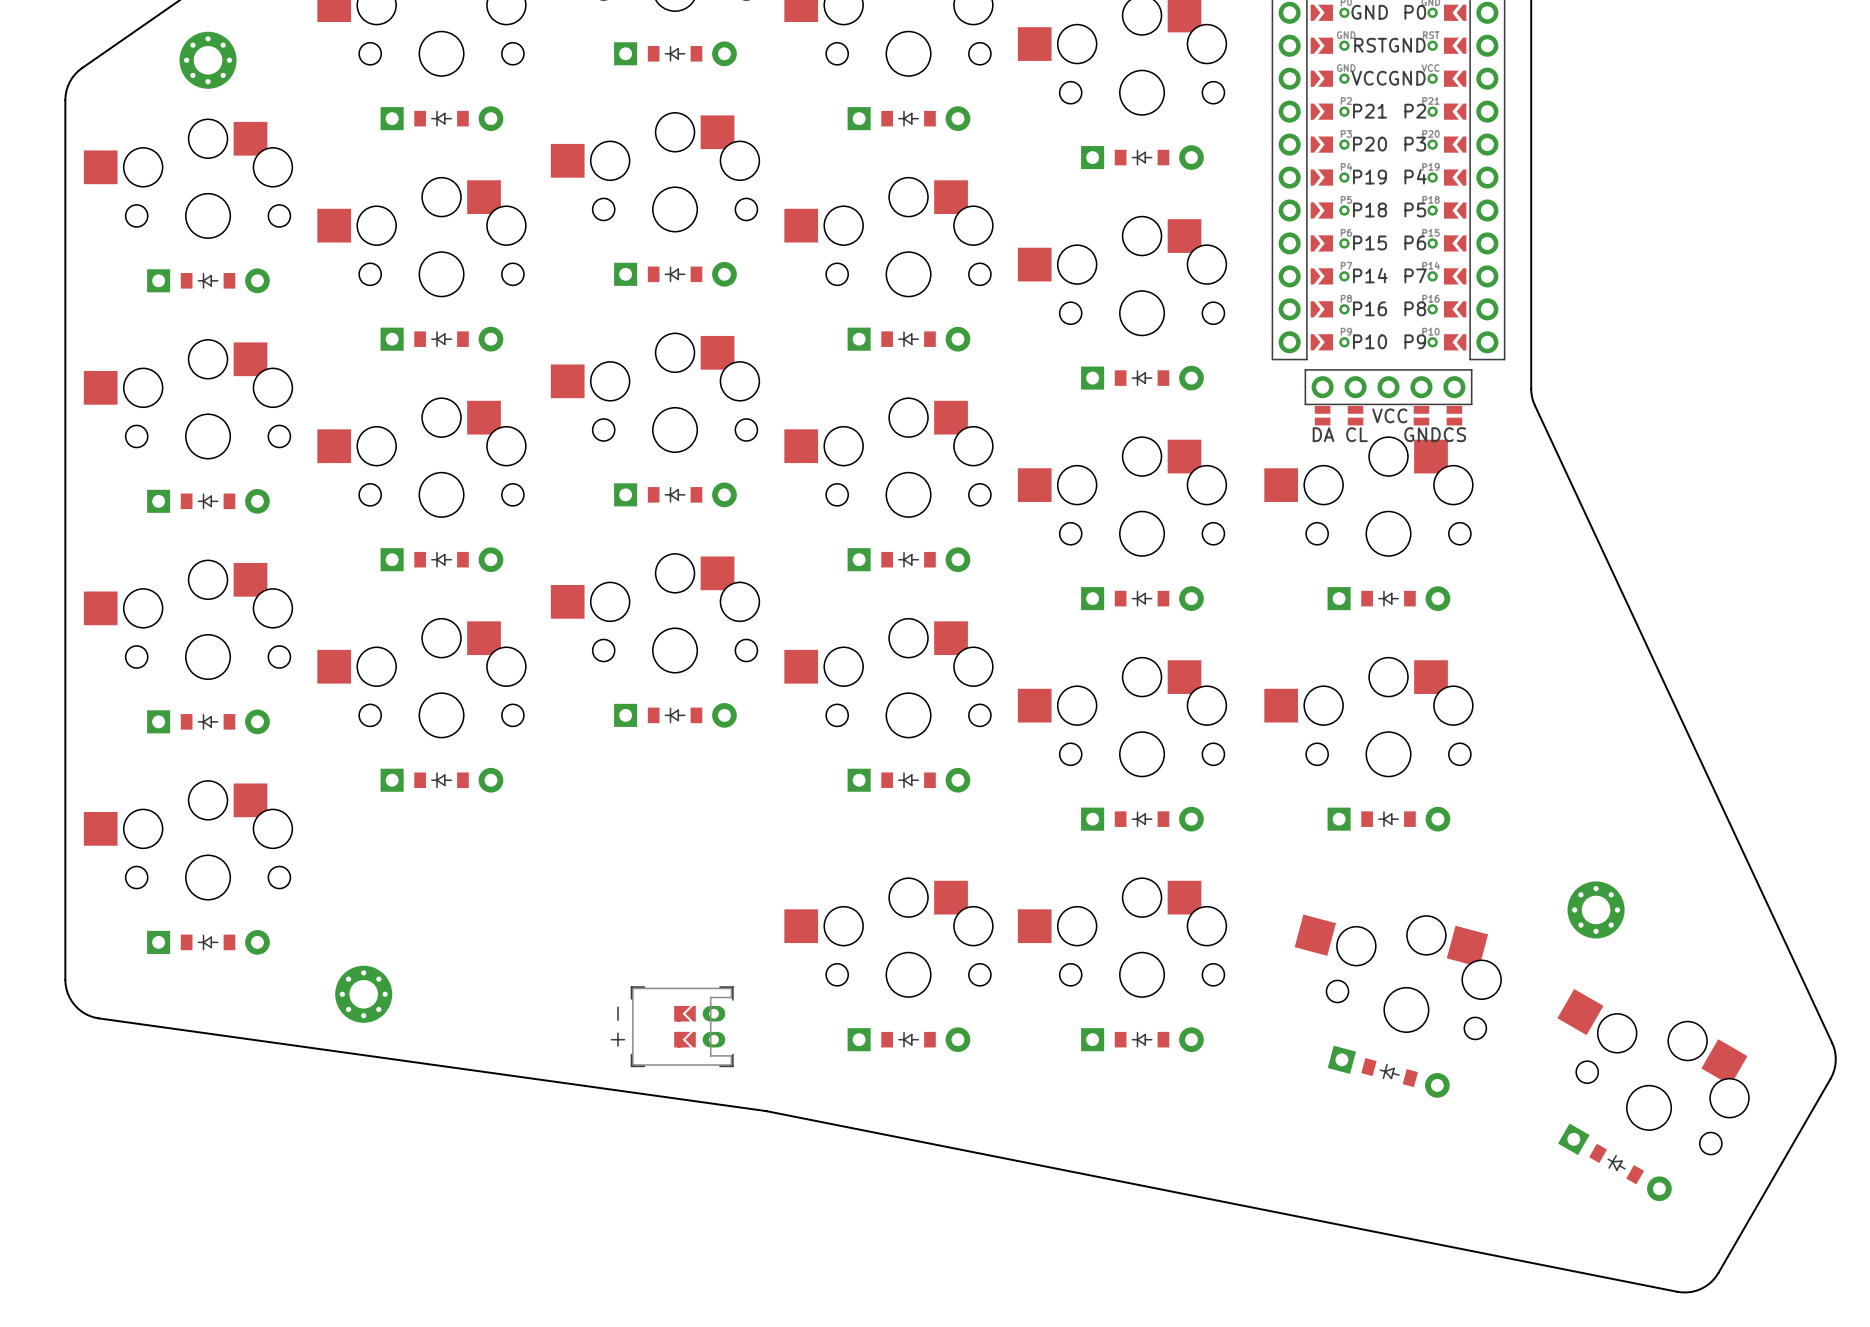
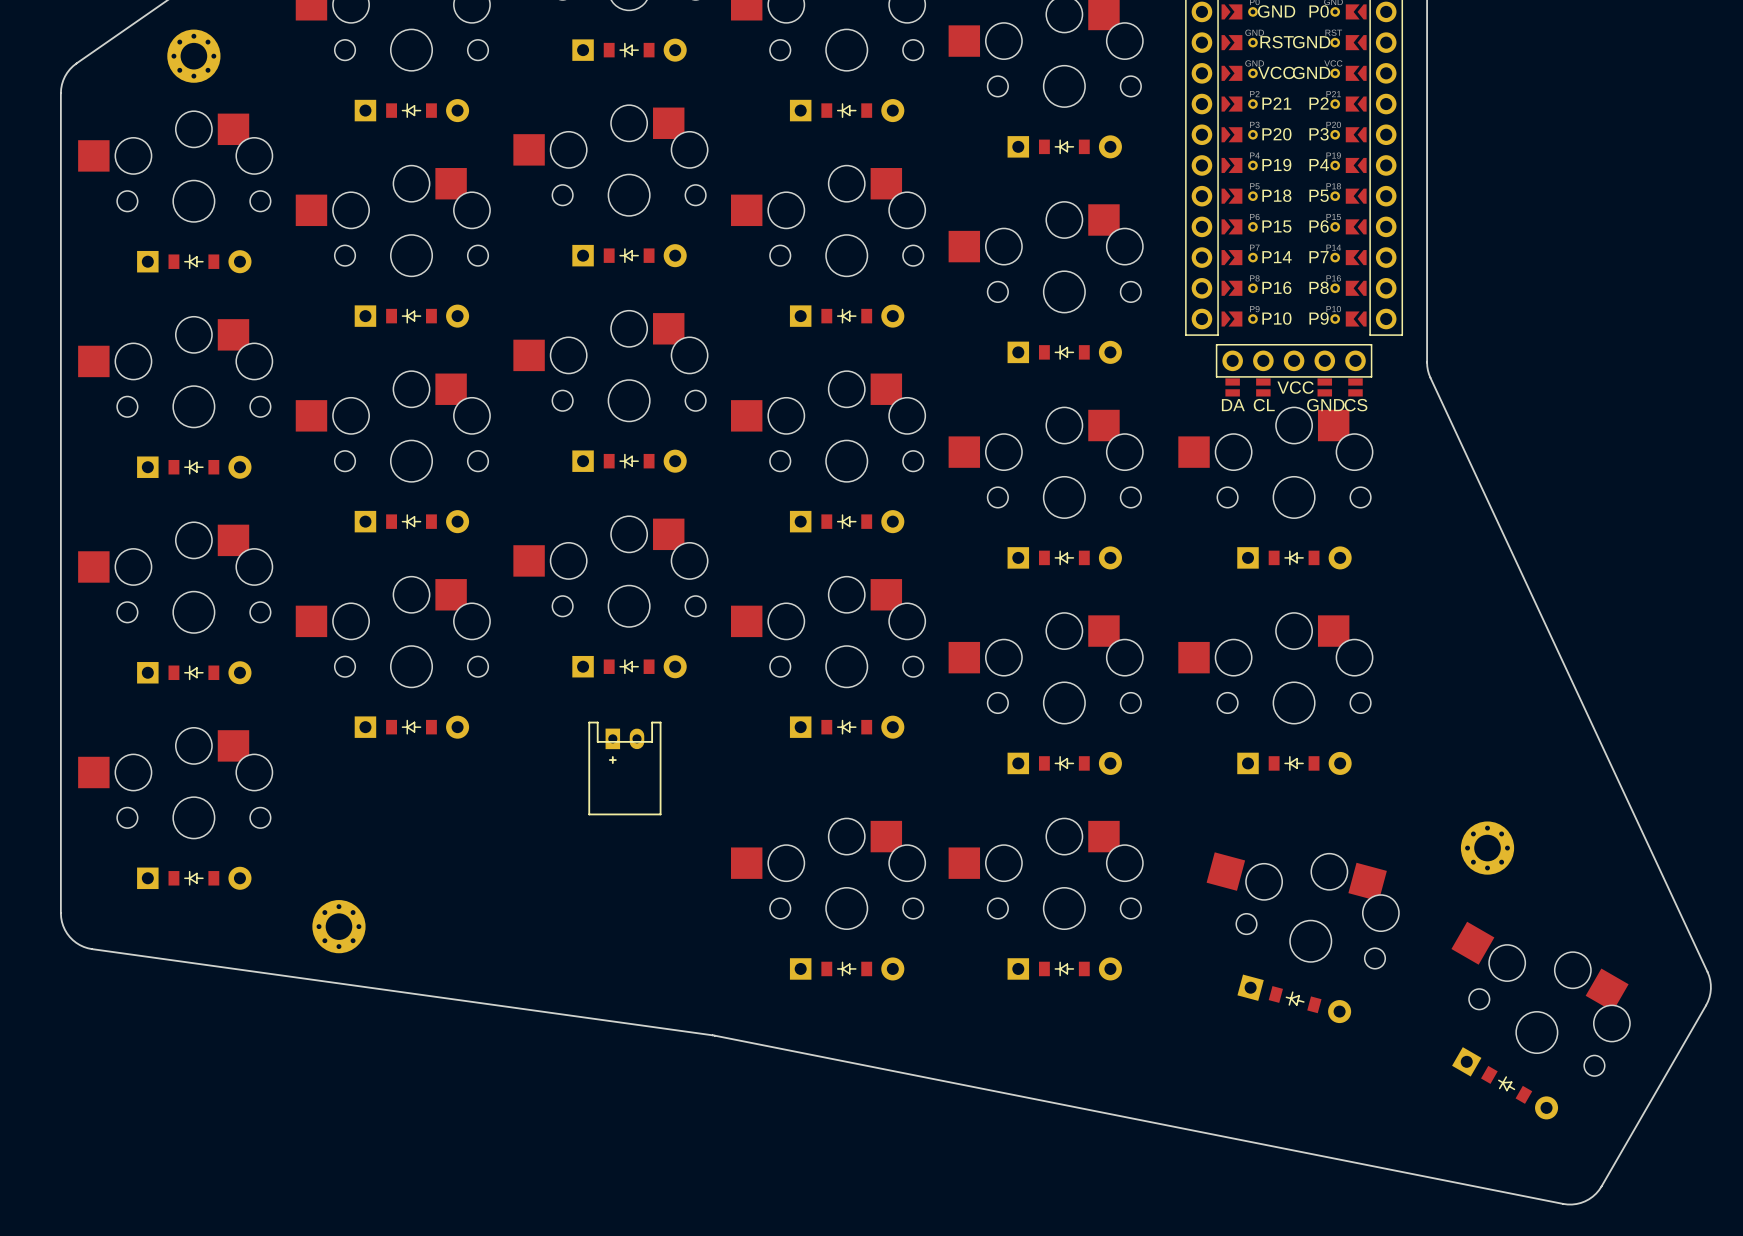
part: none -> (624, 768)
part: (672, 1026) -> none

